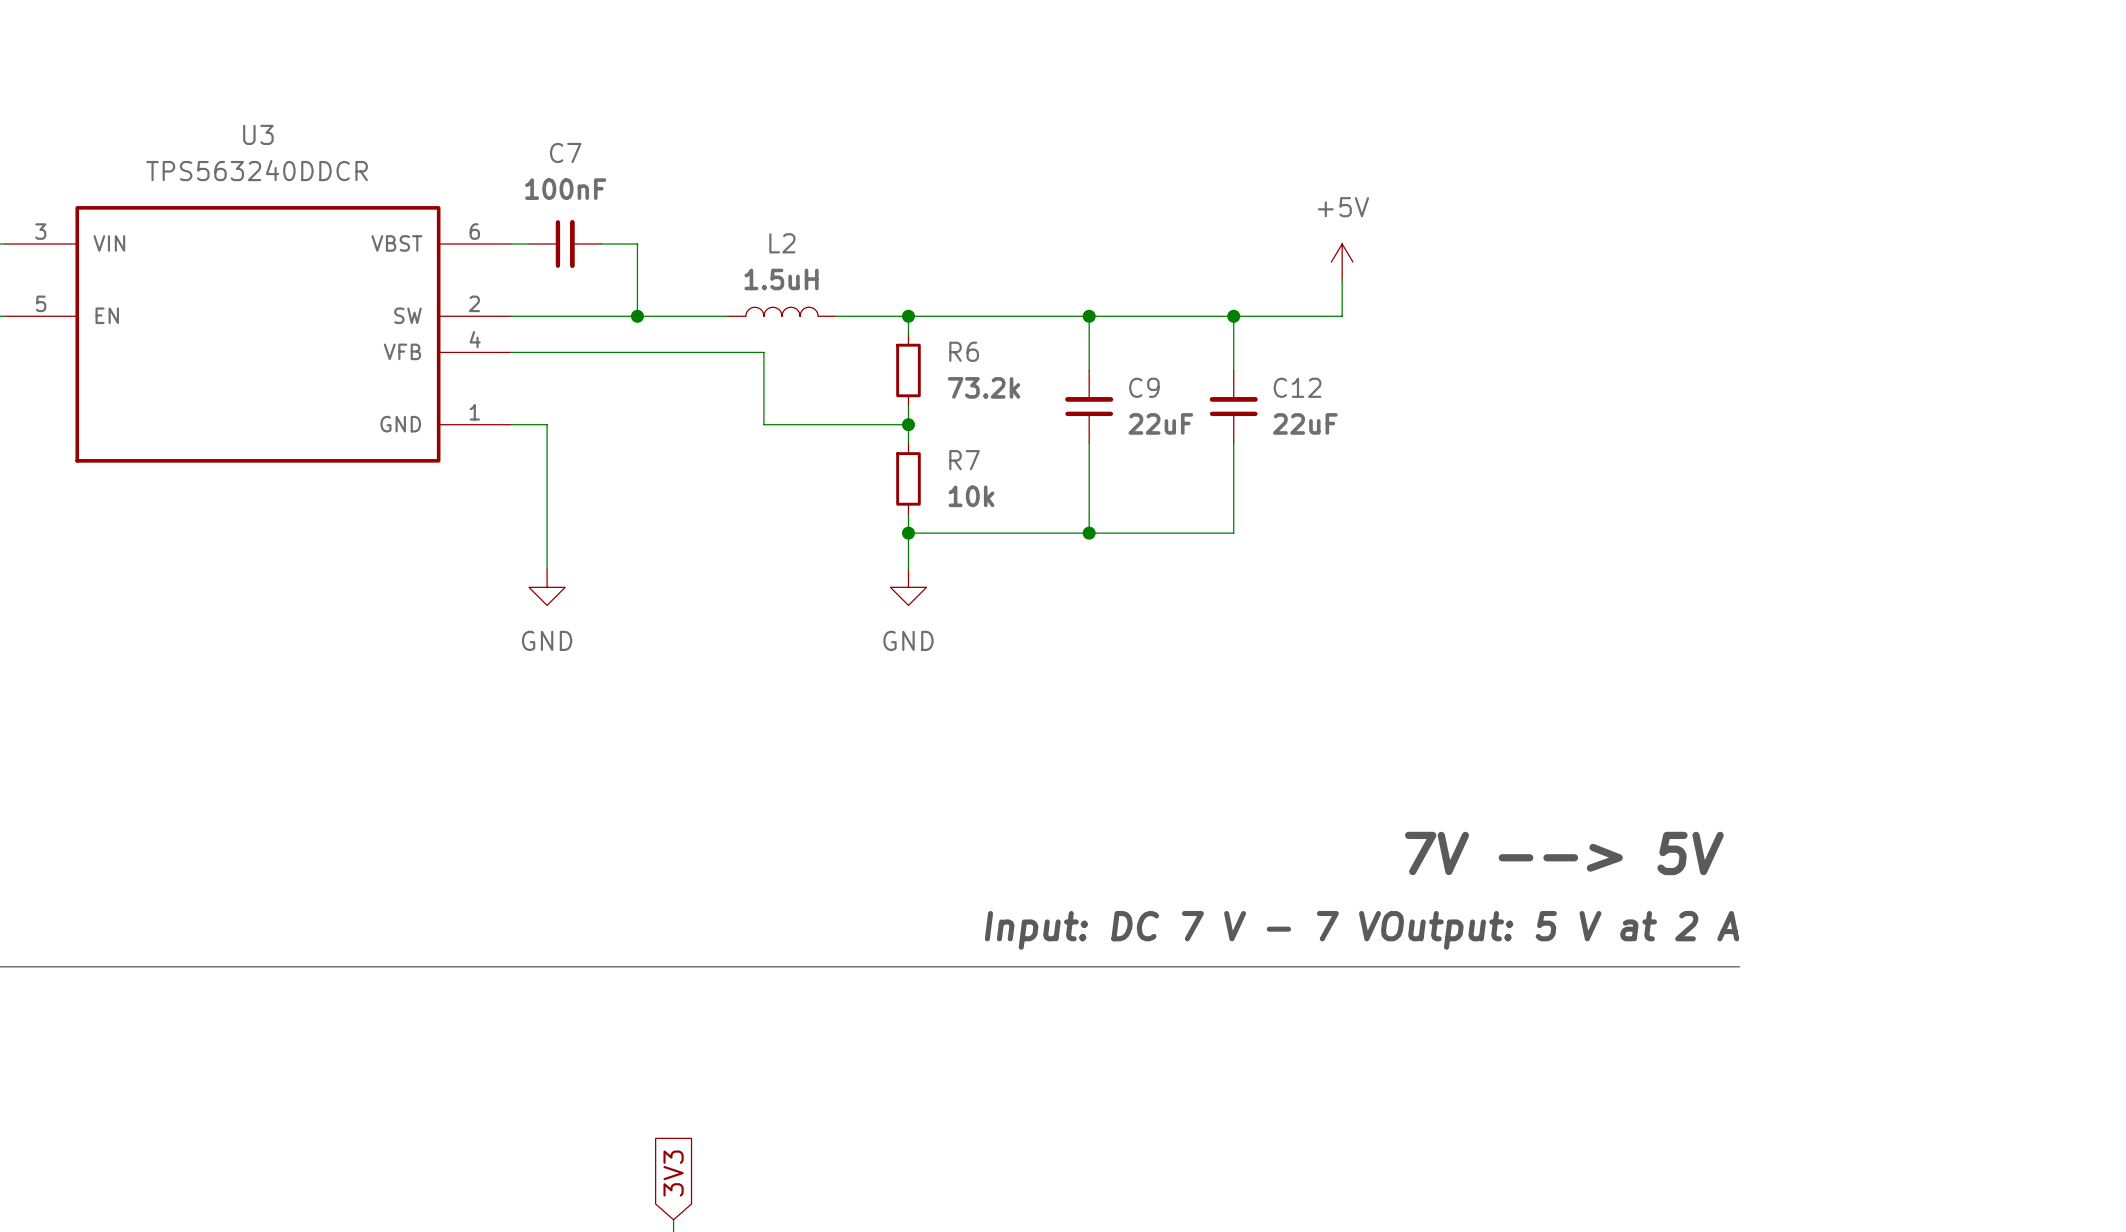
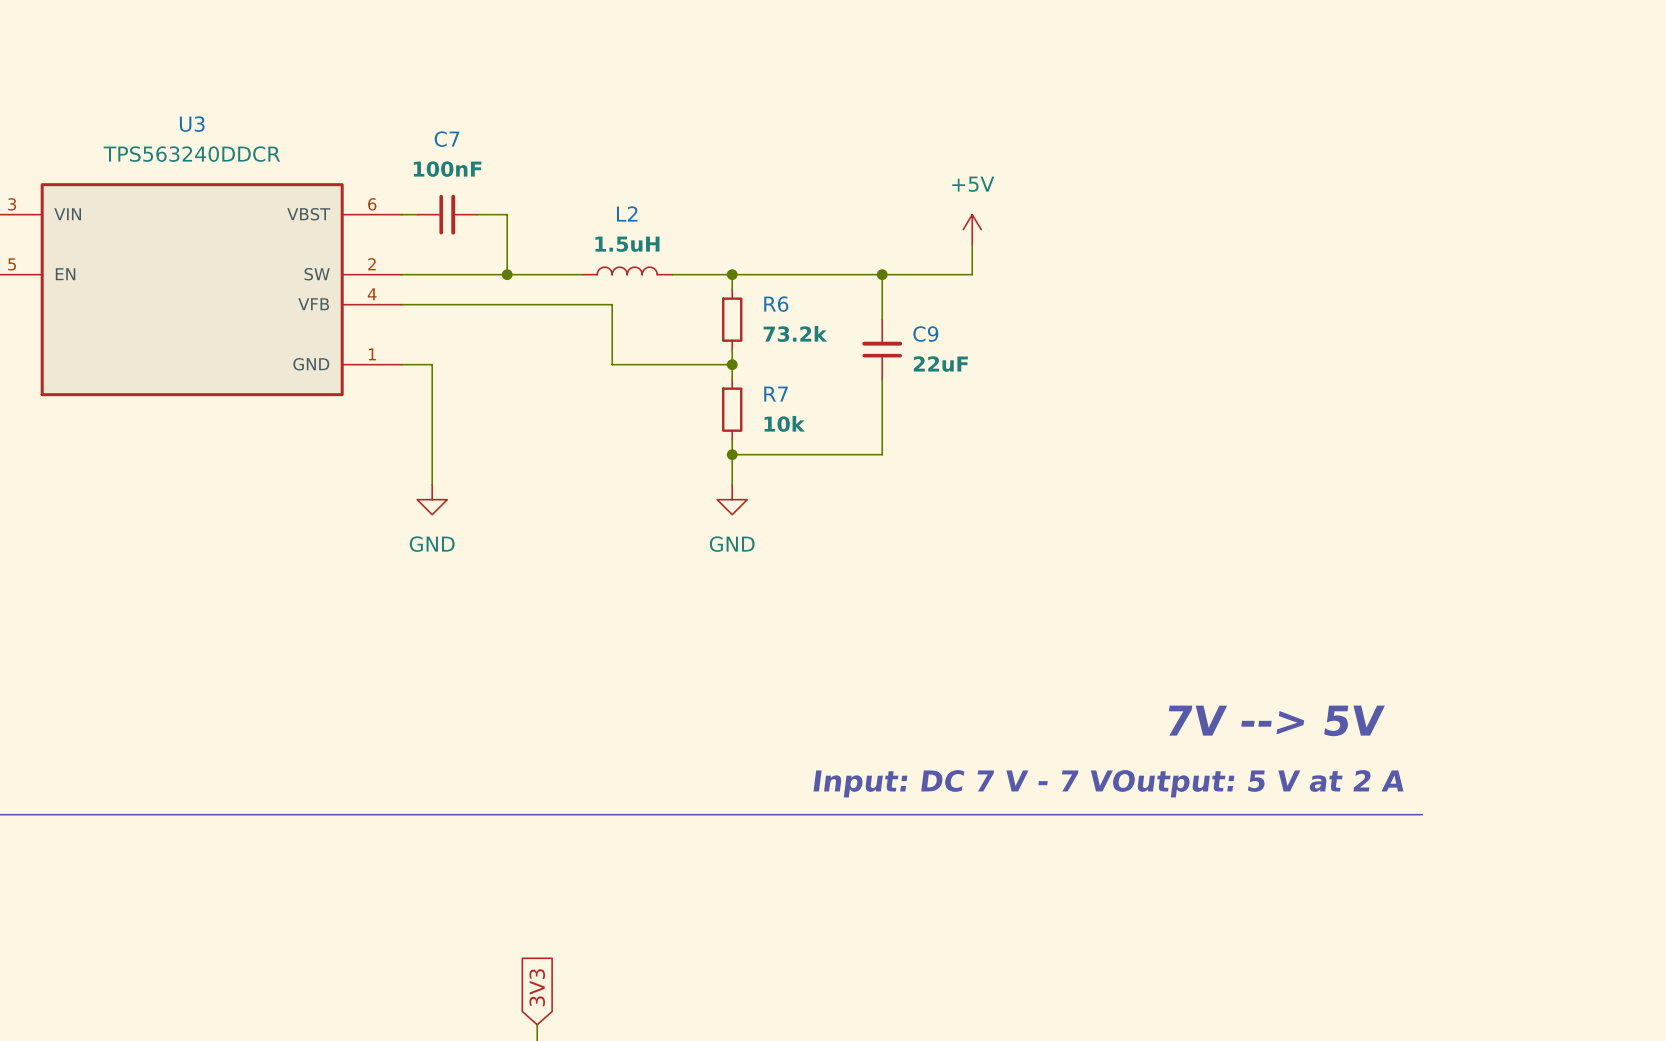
power symbol position: +5V (1342, 262) -> +5V (972, 229)
wire: (1342, 280) (1342, 316) (1197, 316) -> (972, 244) (972, 274)
wire: (1233, 316) (1233, 370) -> none
junction: (1233, 316) -> none
C12: 22uF (1233, 406) -> none
wire: (1233, 442) (1233, 533) (1089, 533) -> none
junction: (1089, 533) -> none

